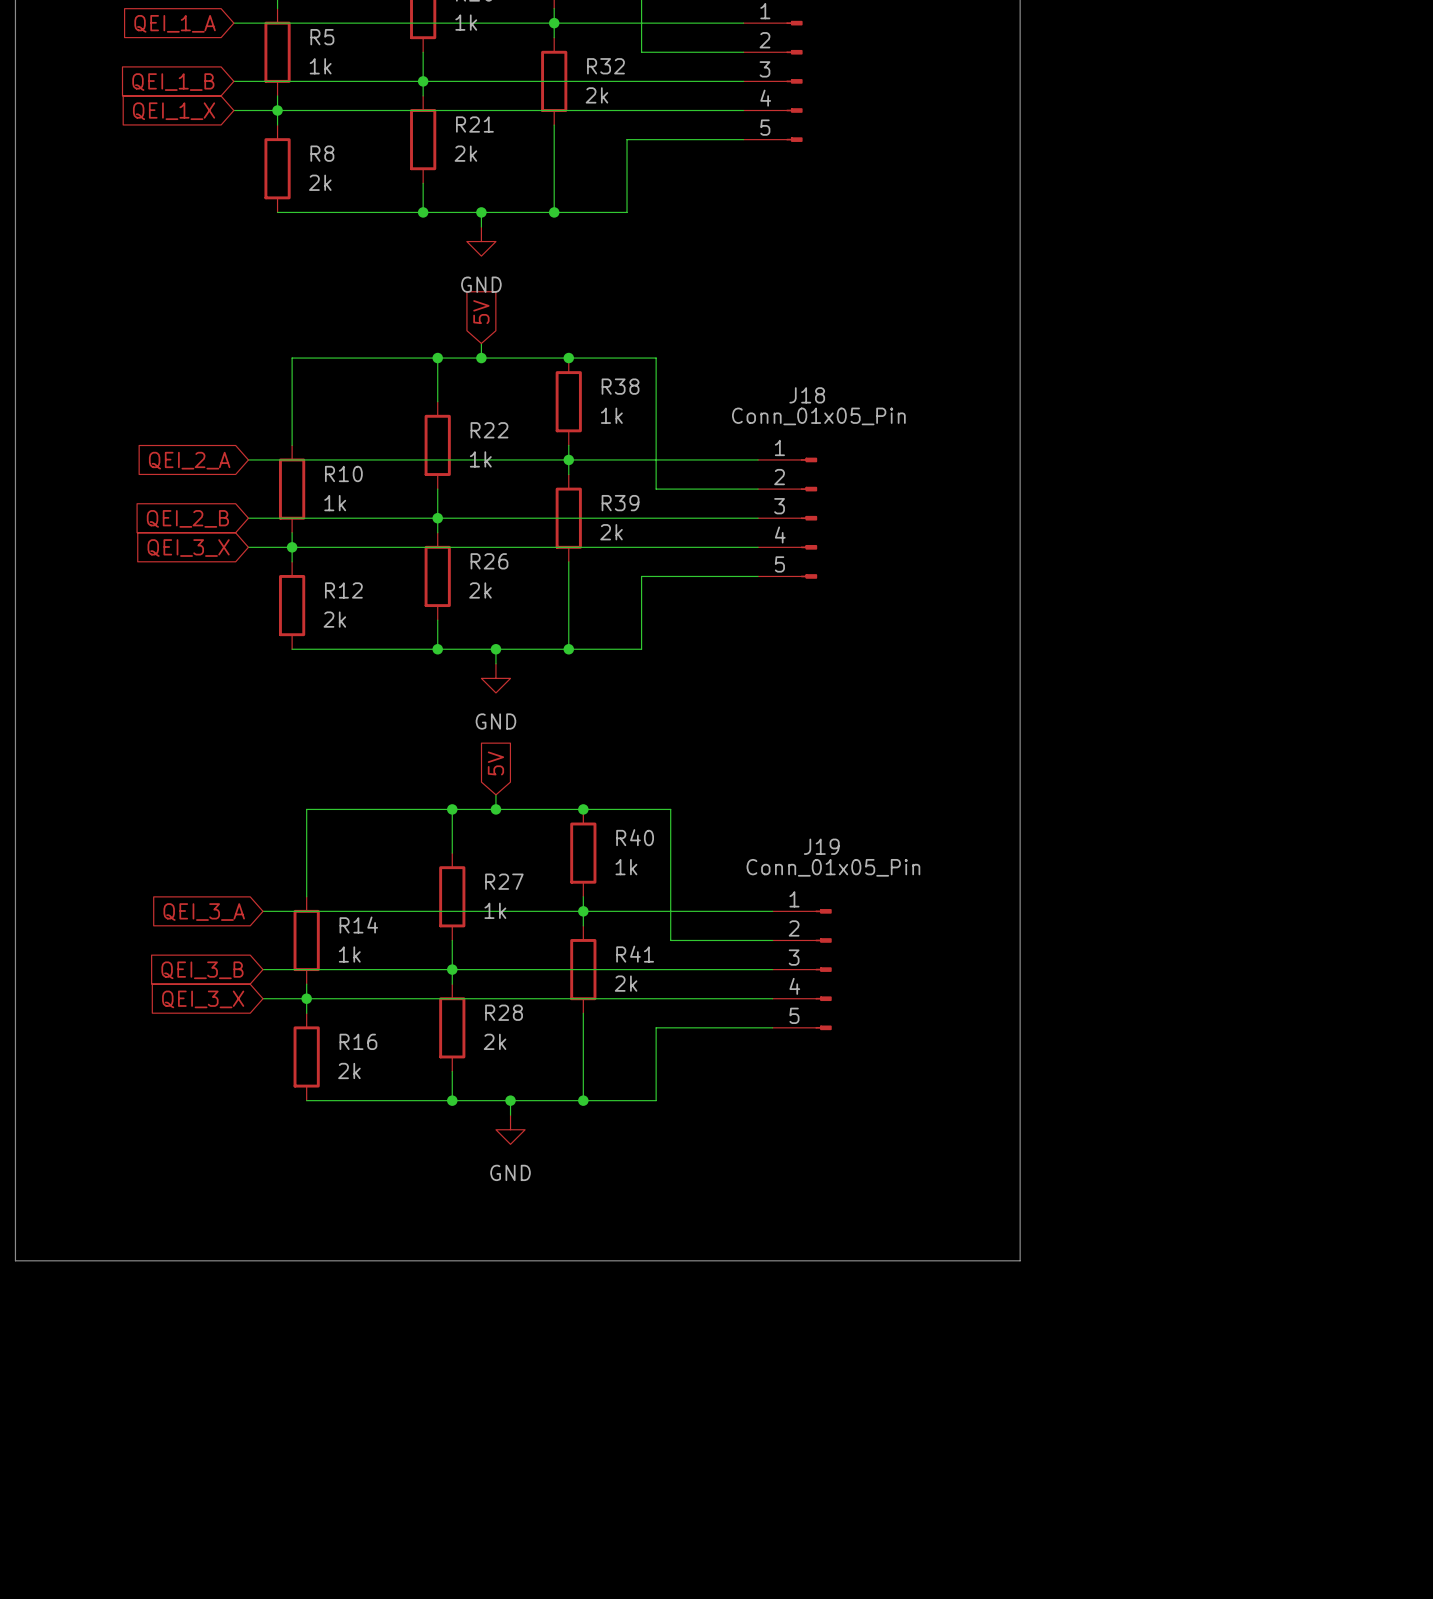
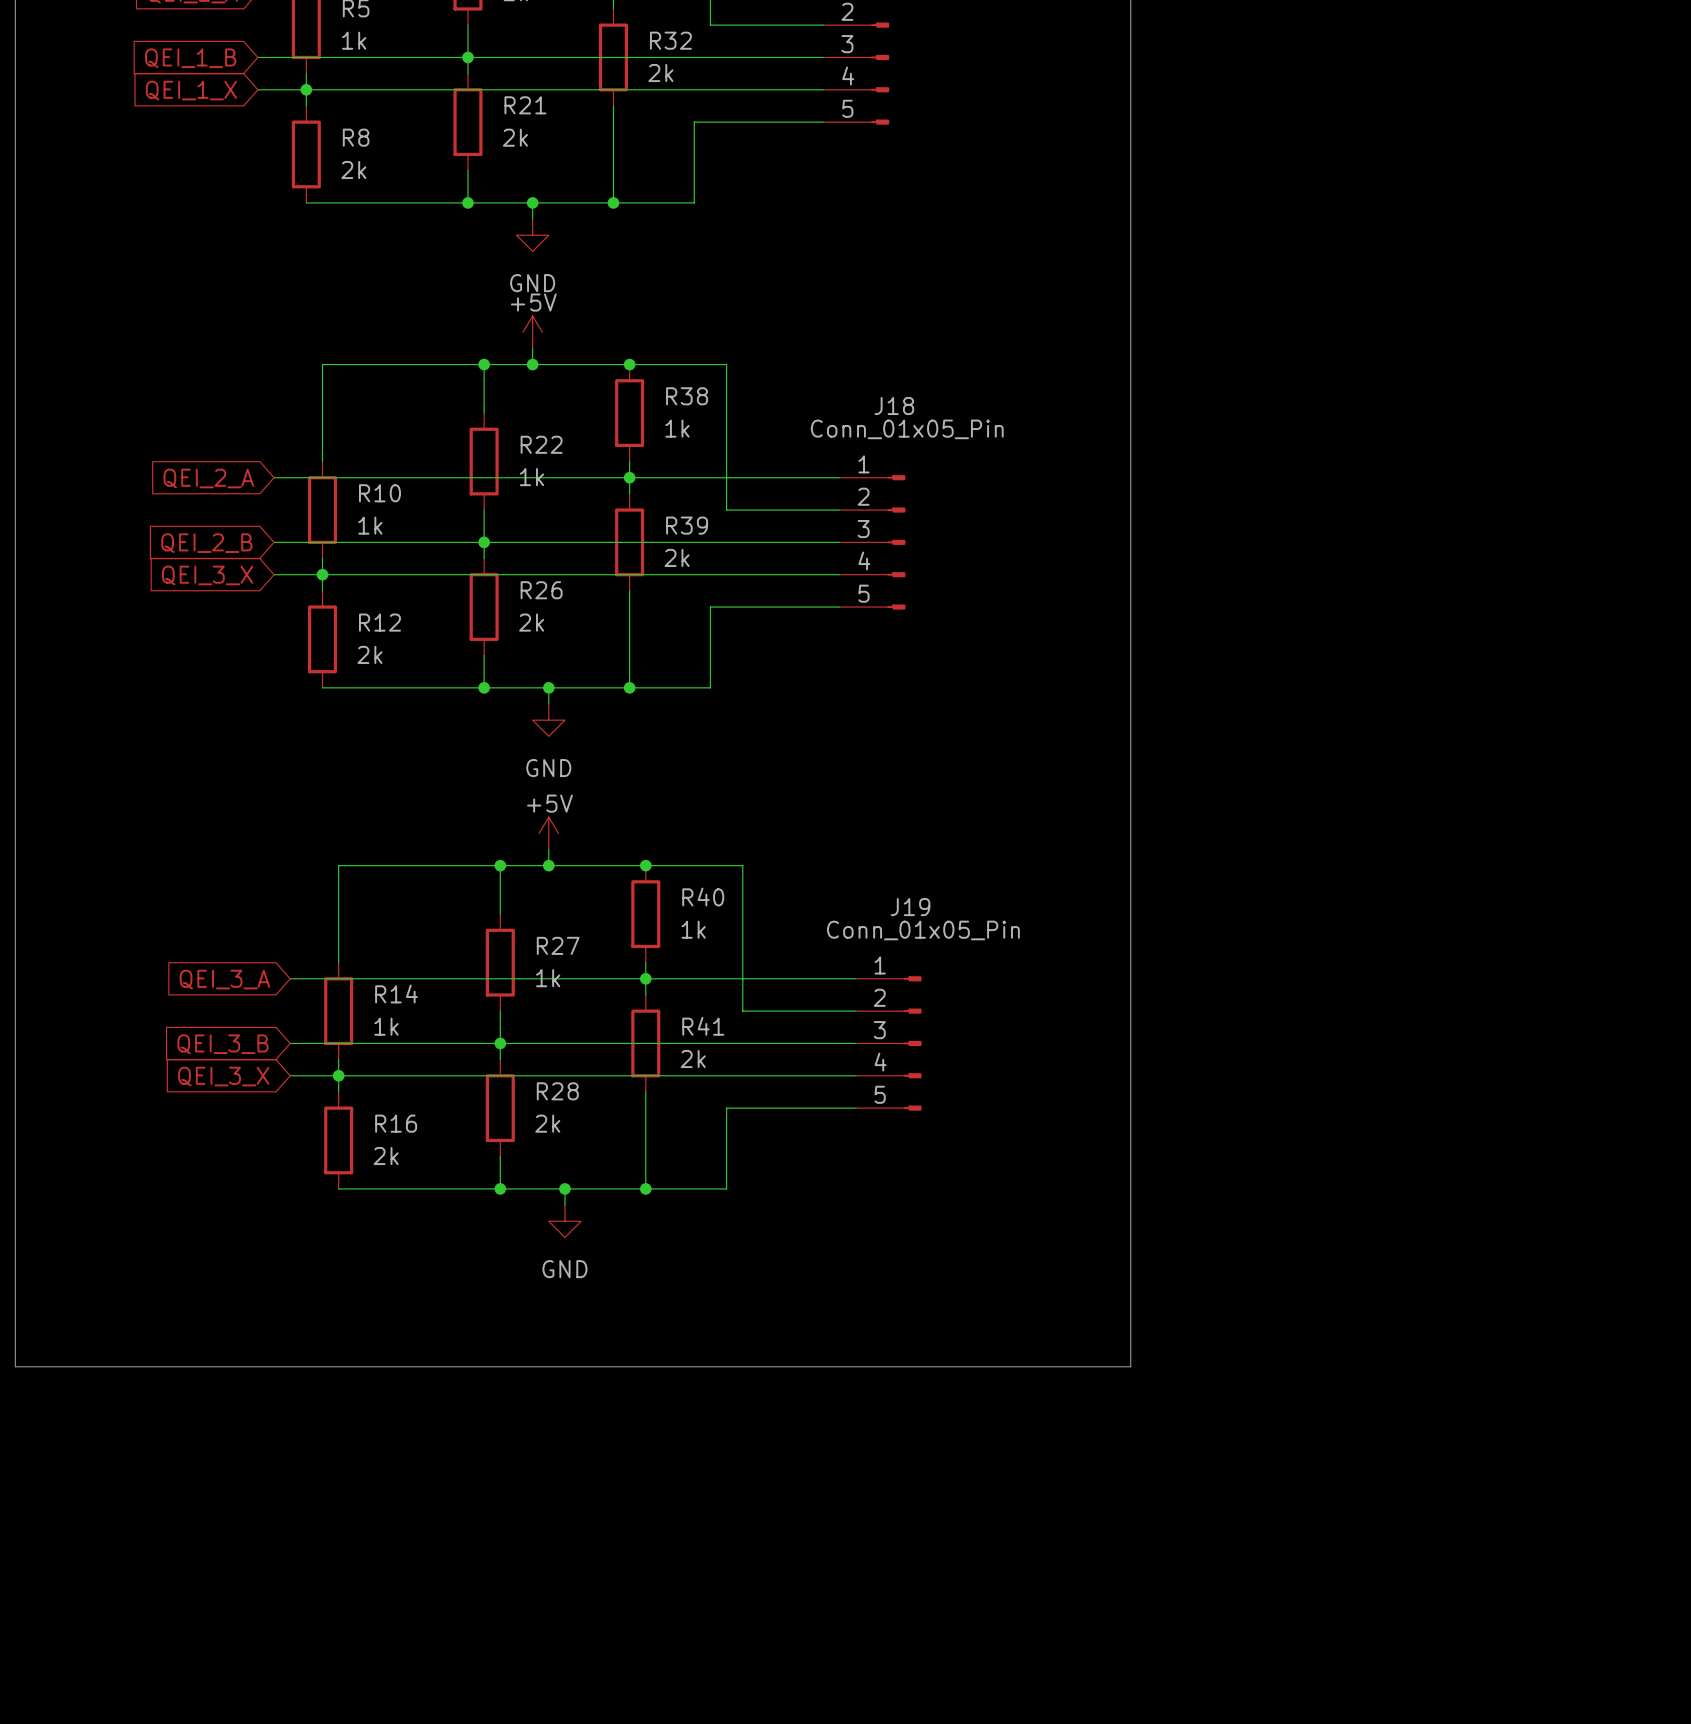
global label: 5V (481, 312) -> none
power symbol: none -> +5V (532, 332)
global label: 5V (495, 763) -> none
power symbol: none -> +5V (548, 833)

